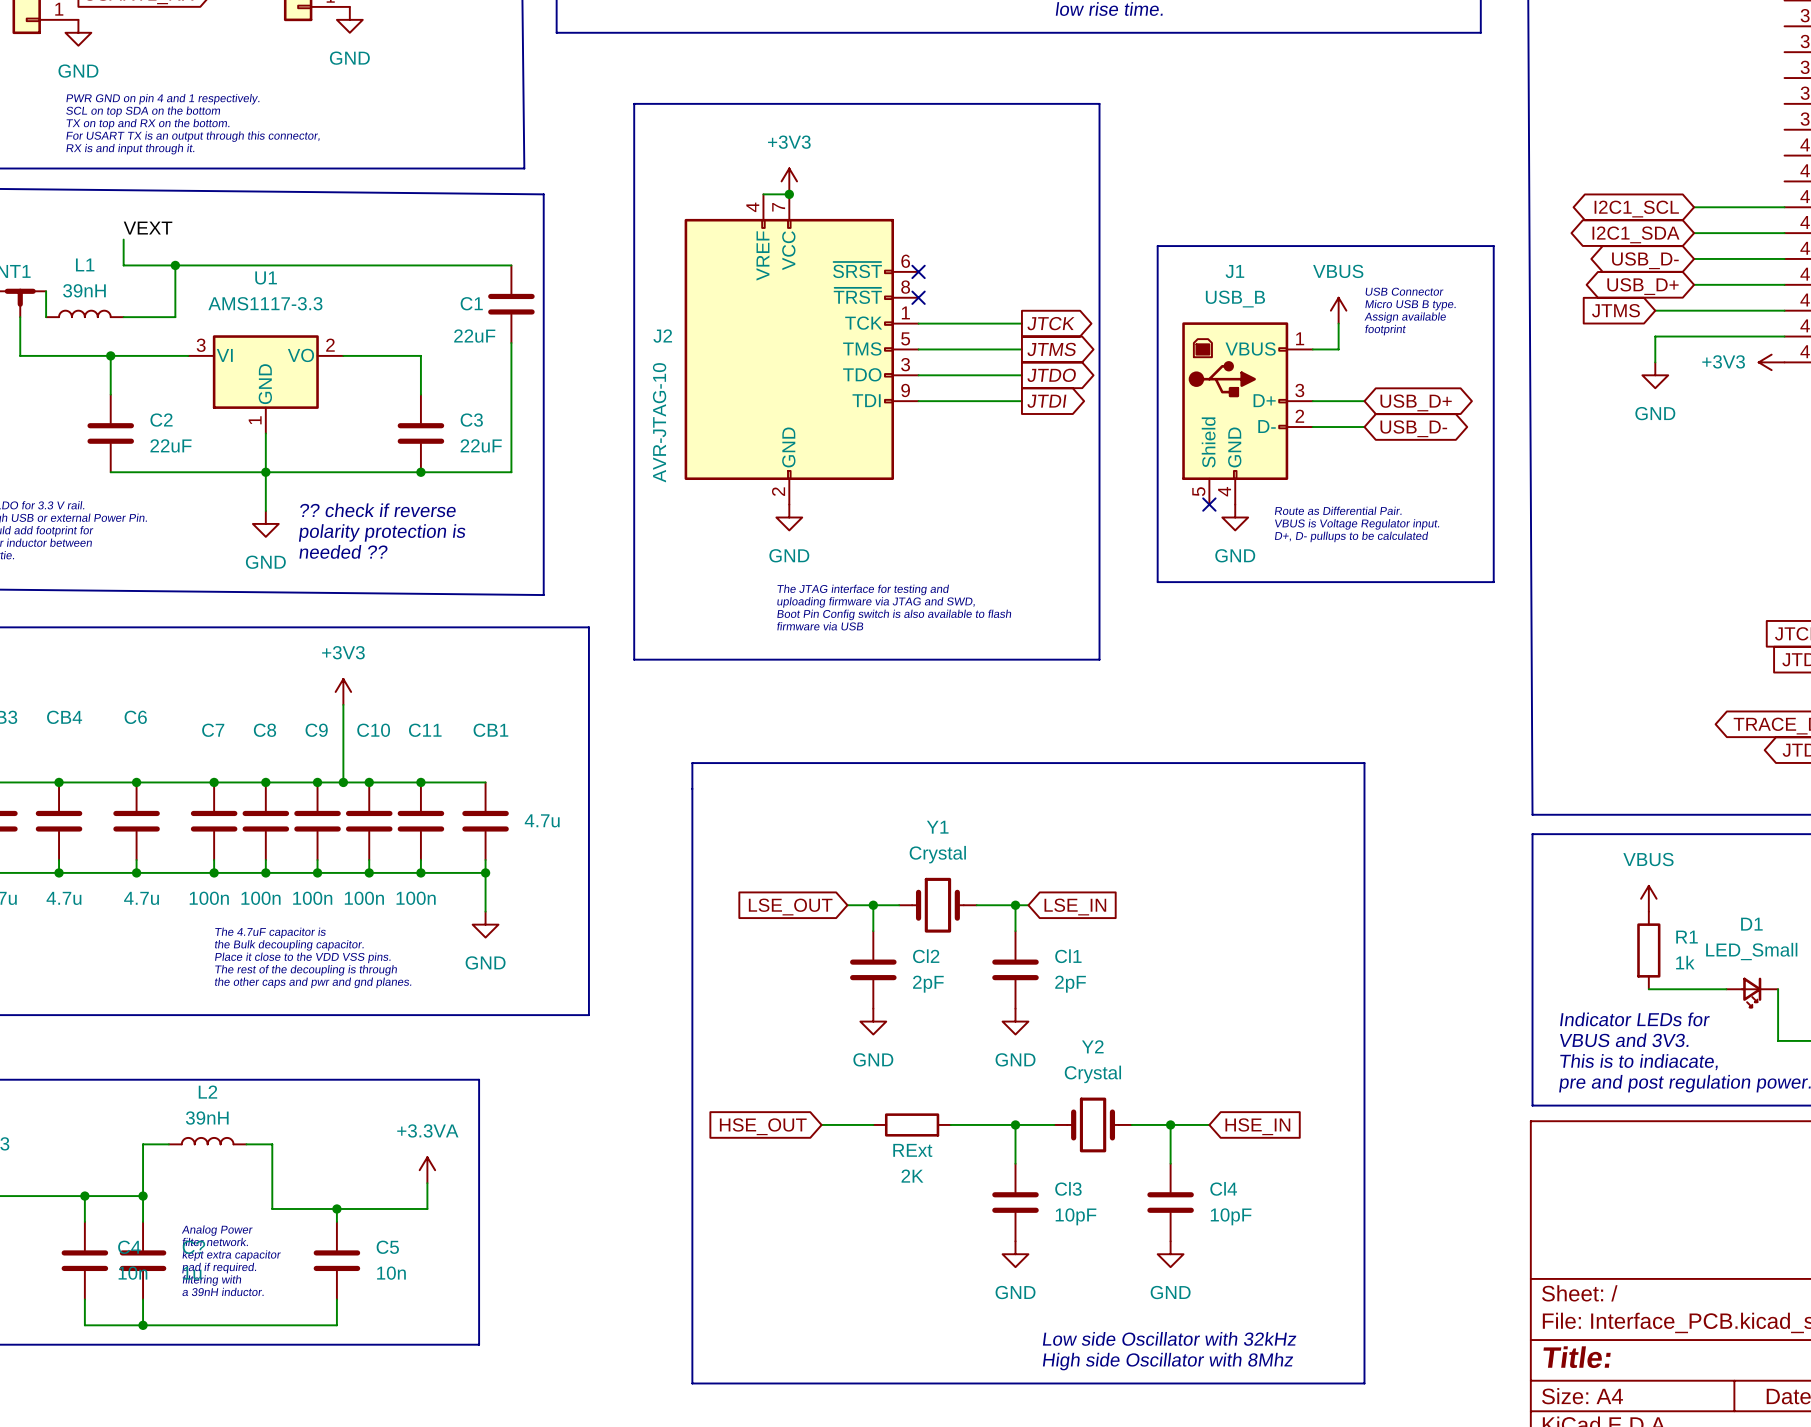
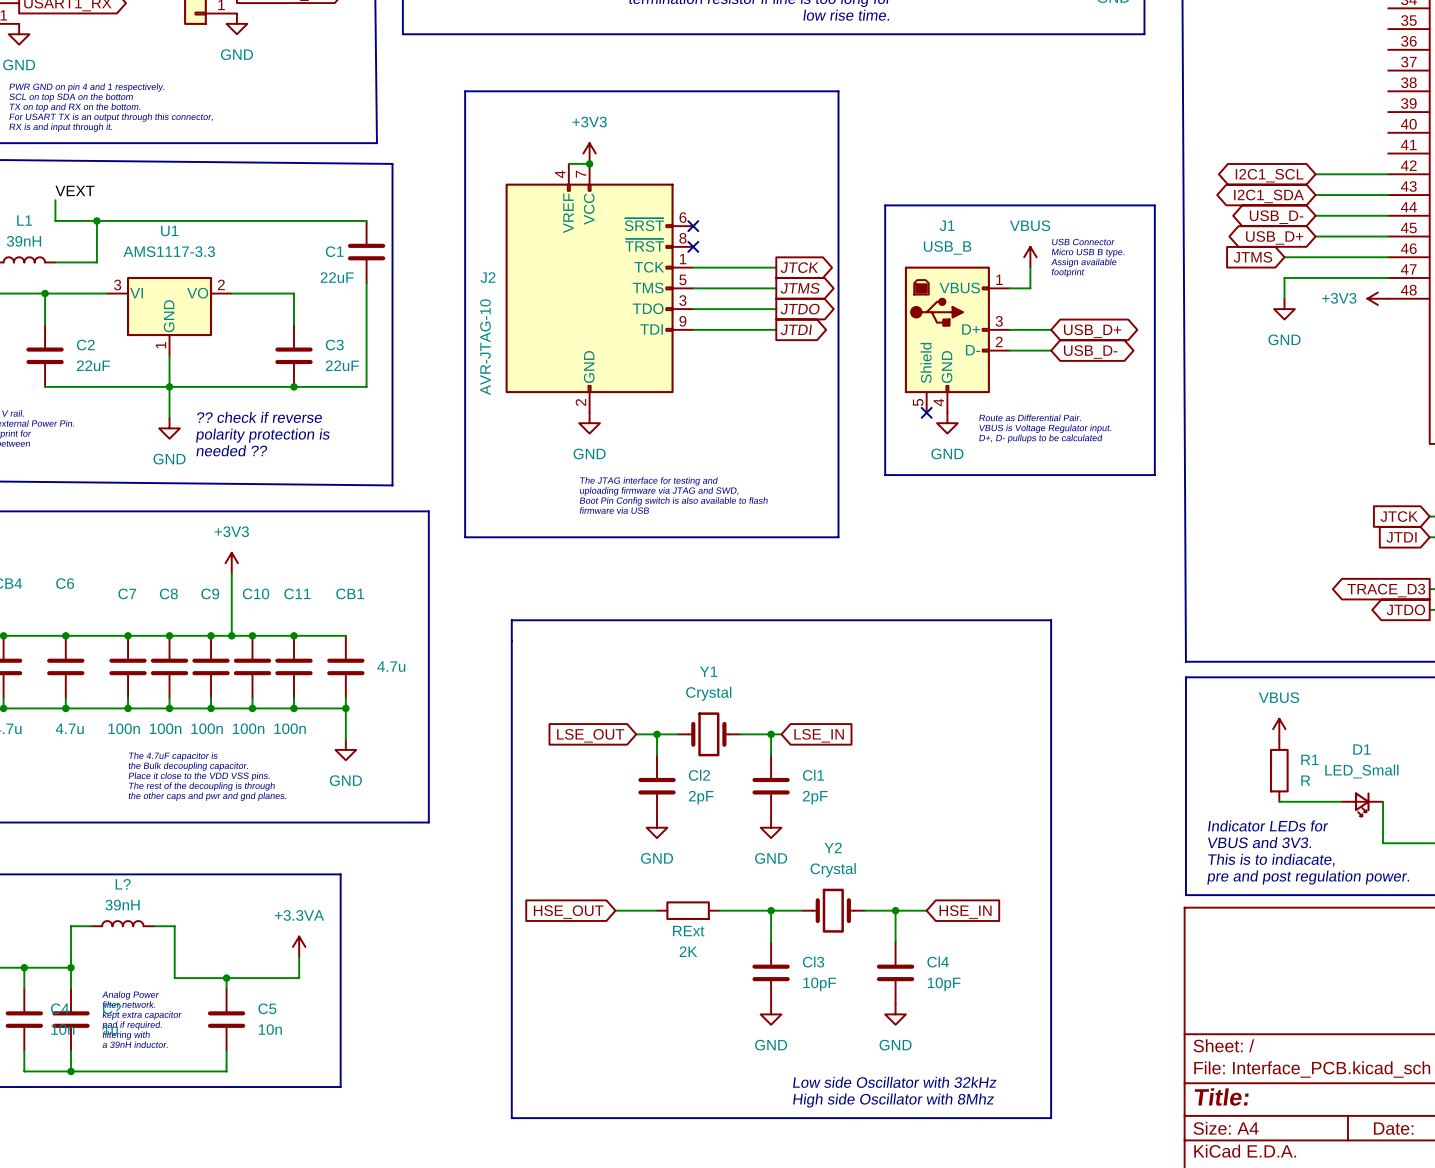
R1 value: 1k (1685, 962) -> R (1305, 780)
L2 name: L2 (207, 1092) -> L? (123, 884)

